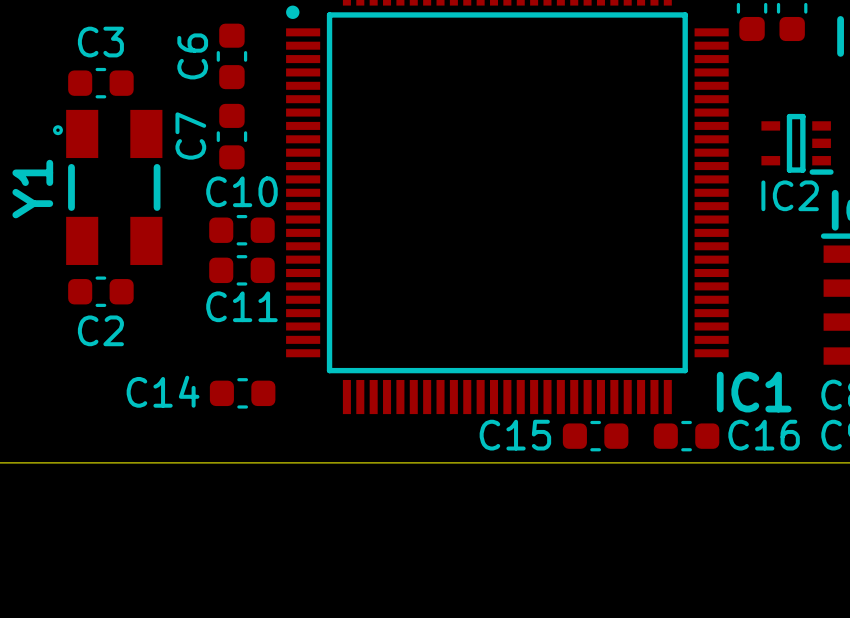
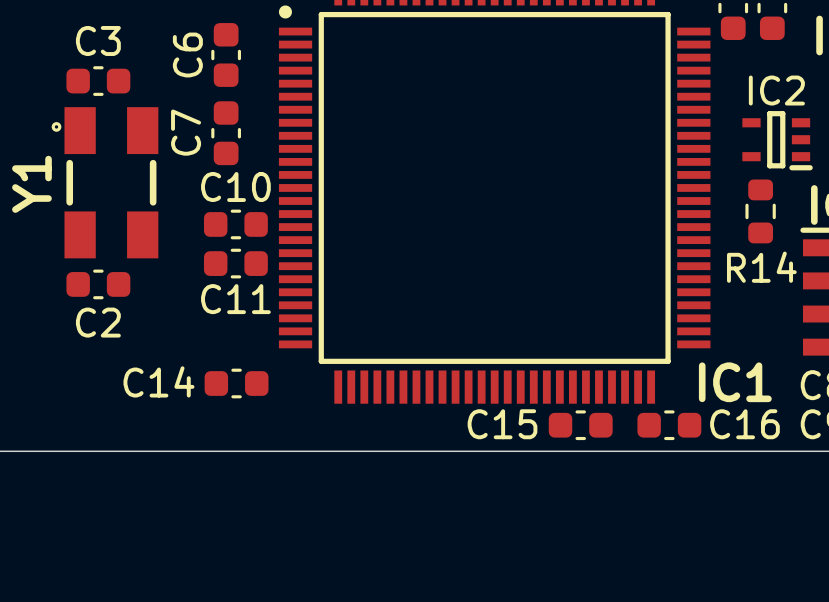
IC2 name position: IC2 (790, 195) -> IC2 (776, 90)
R14: none -> (760, 211)

